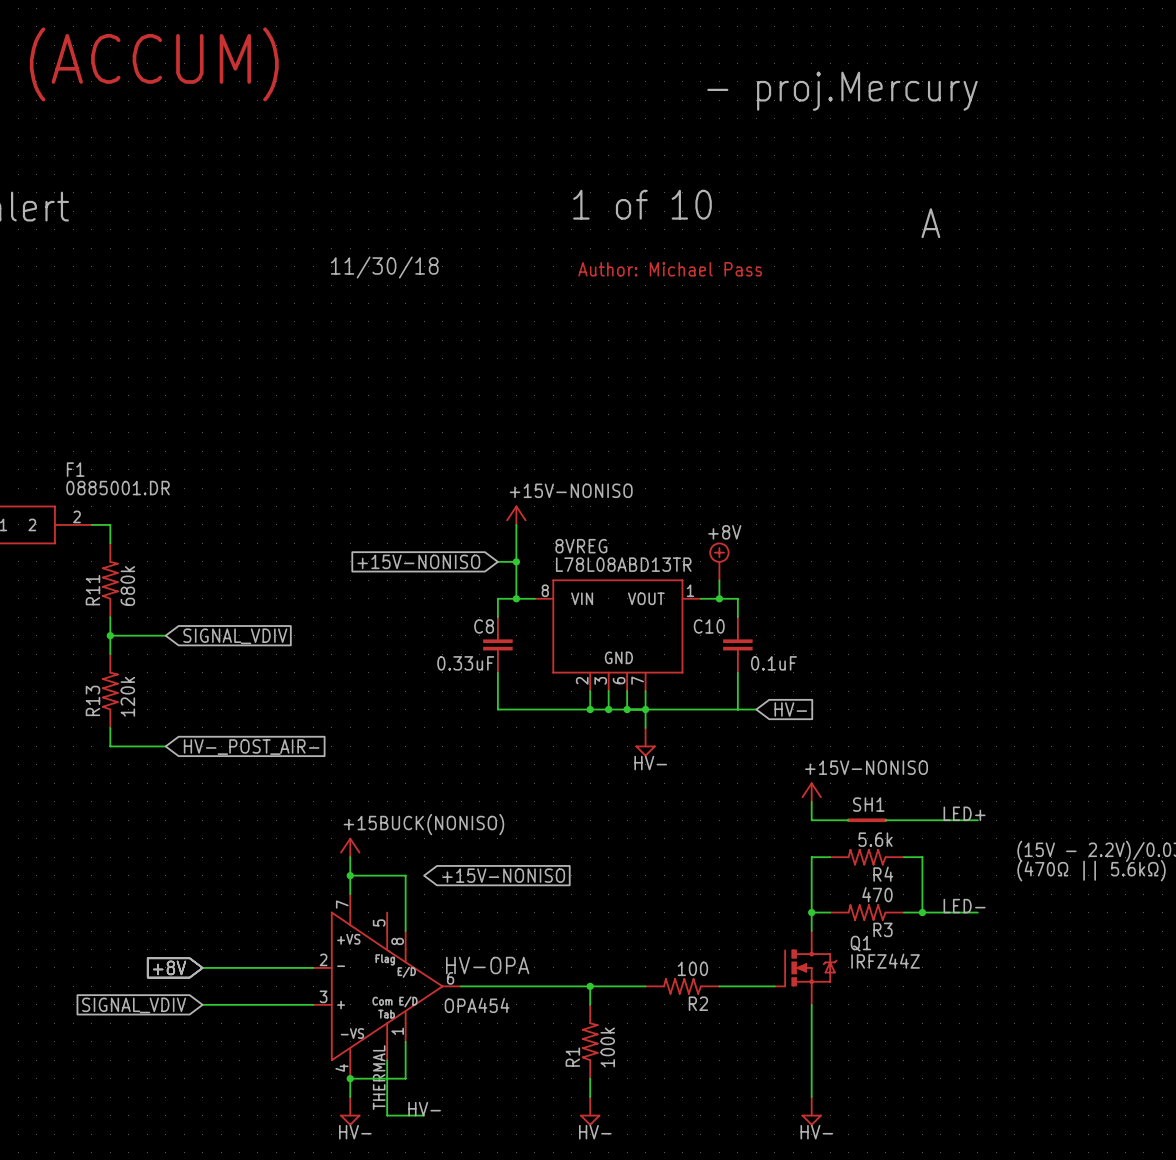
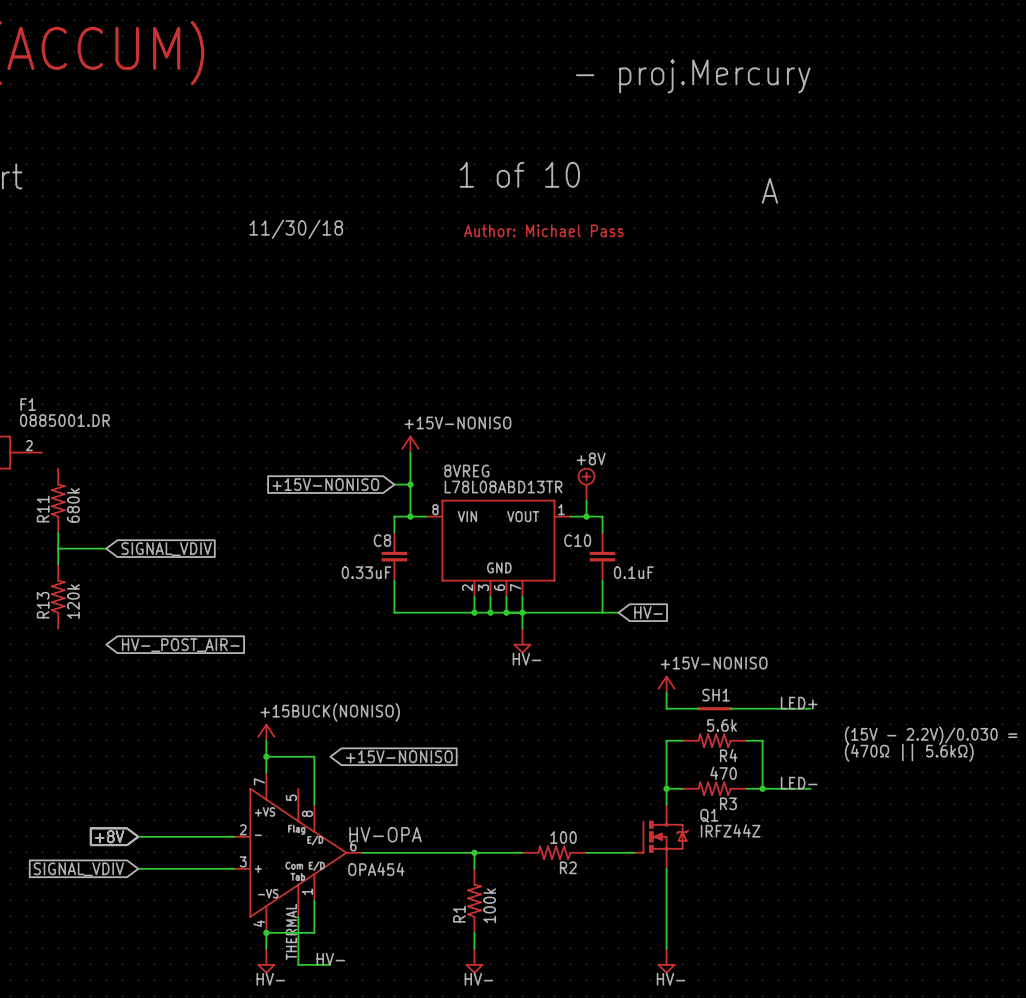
wire: (91, 524) (110, 524) (110, 543) -> none
junction: (110, 635) -> none
wire: (110, 727) (110, 746) (165, 746) -> none

